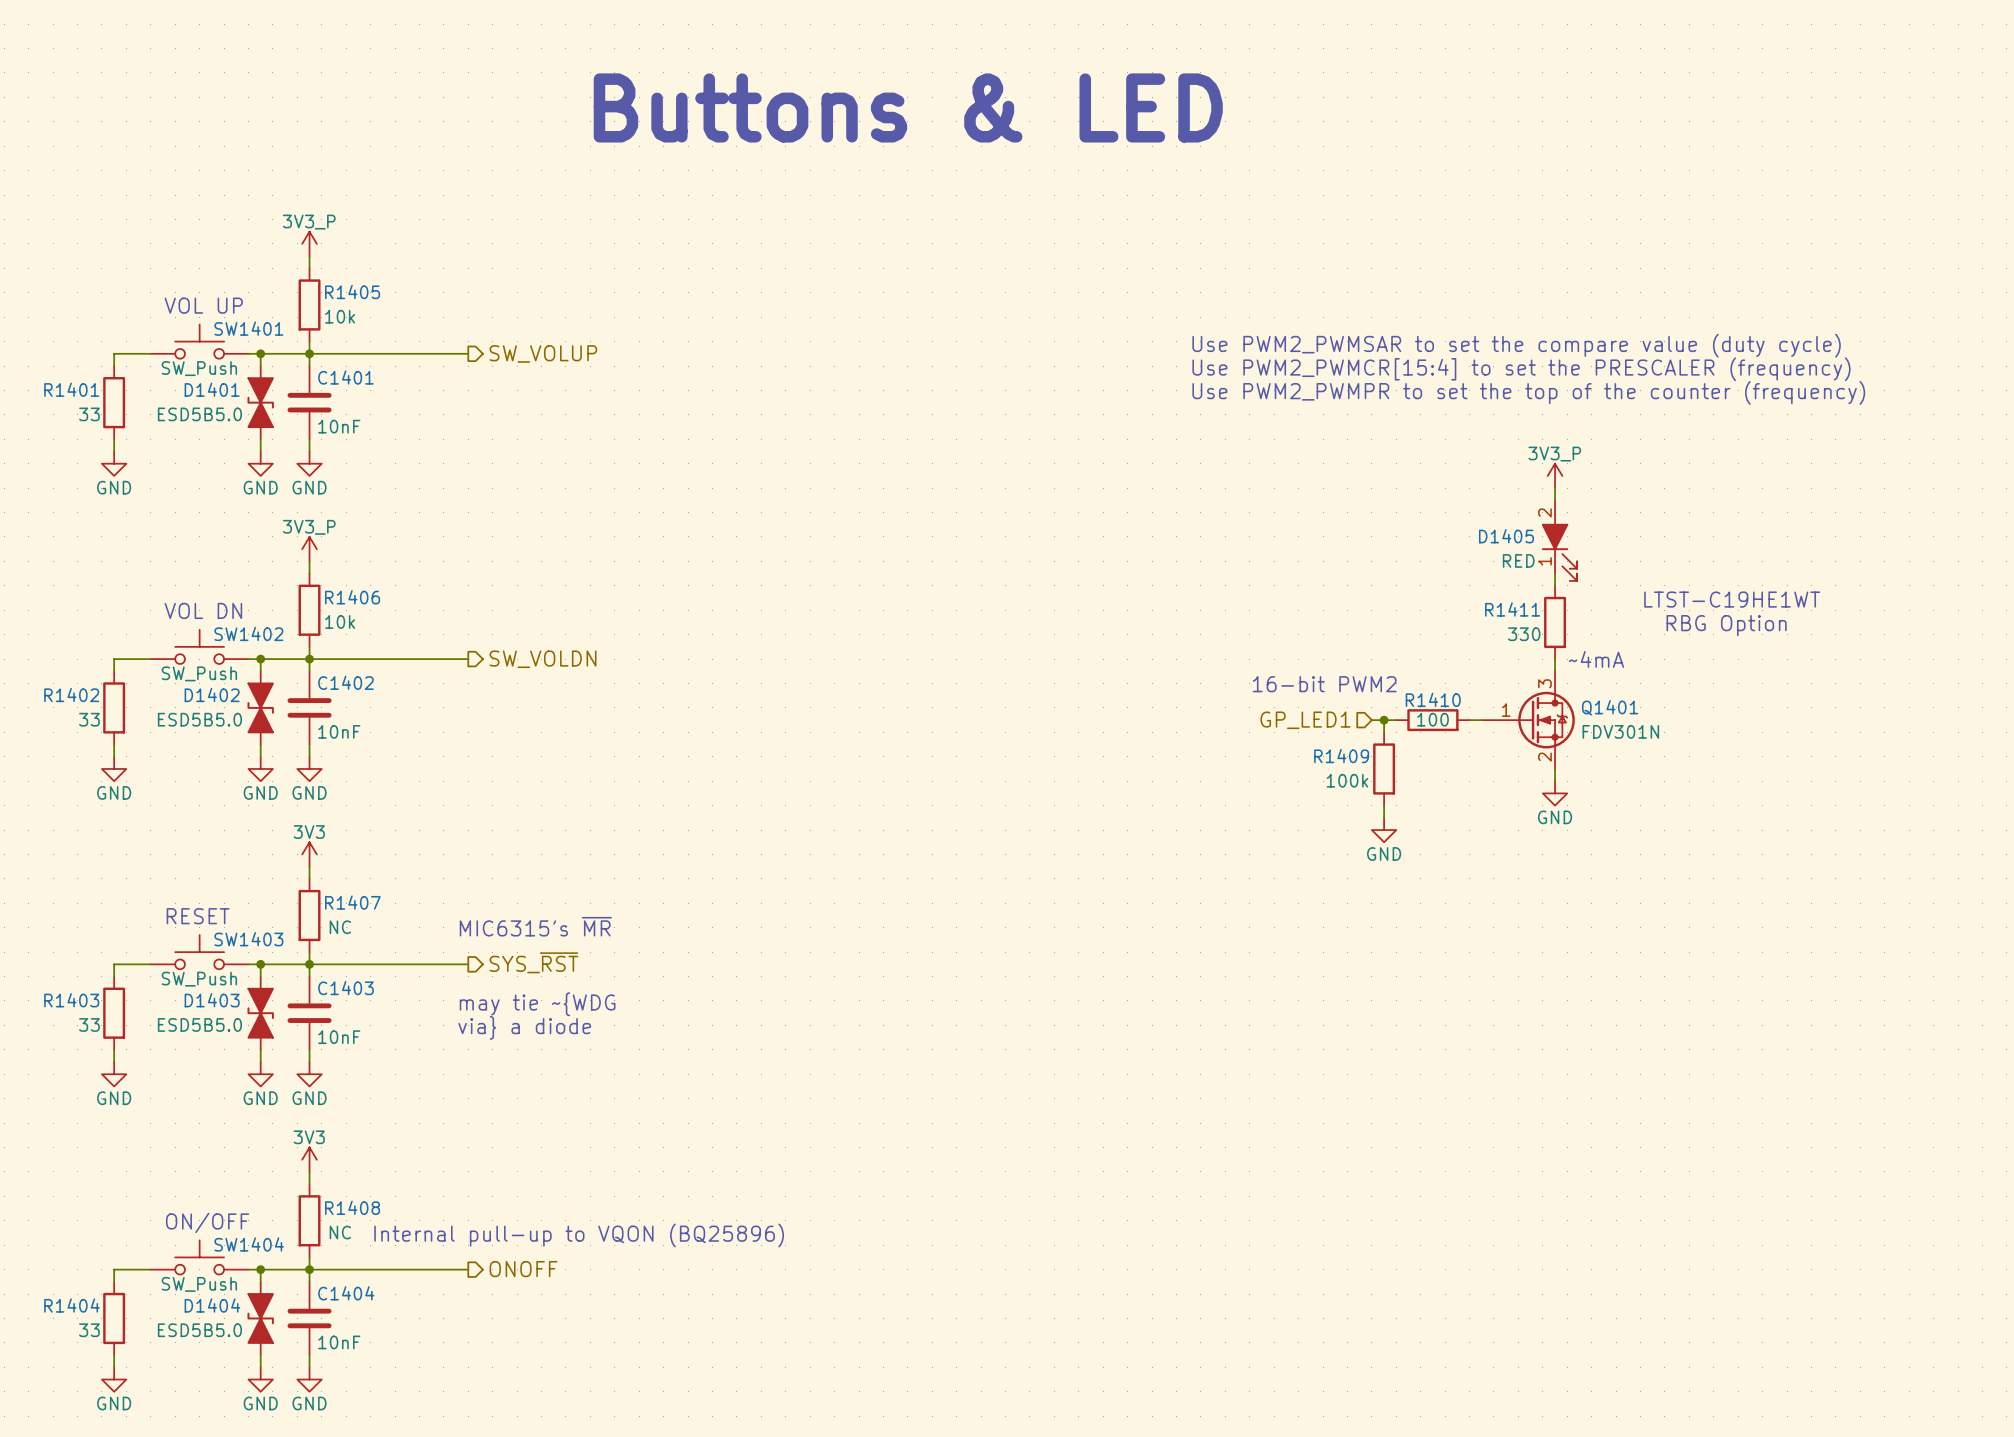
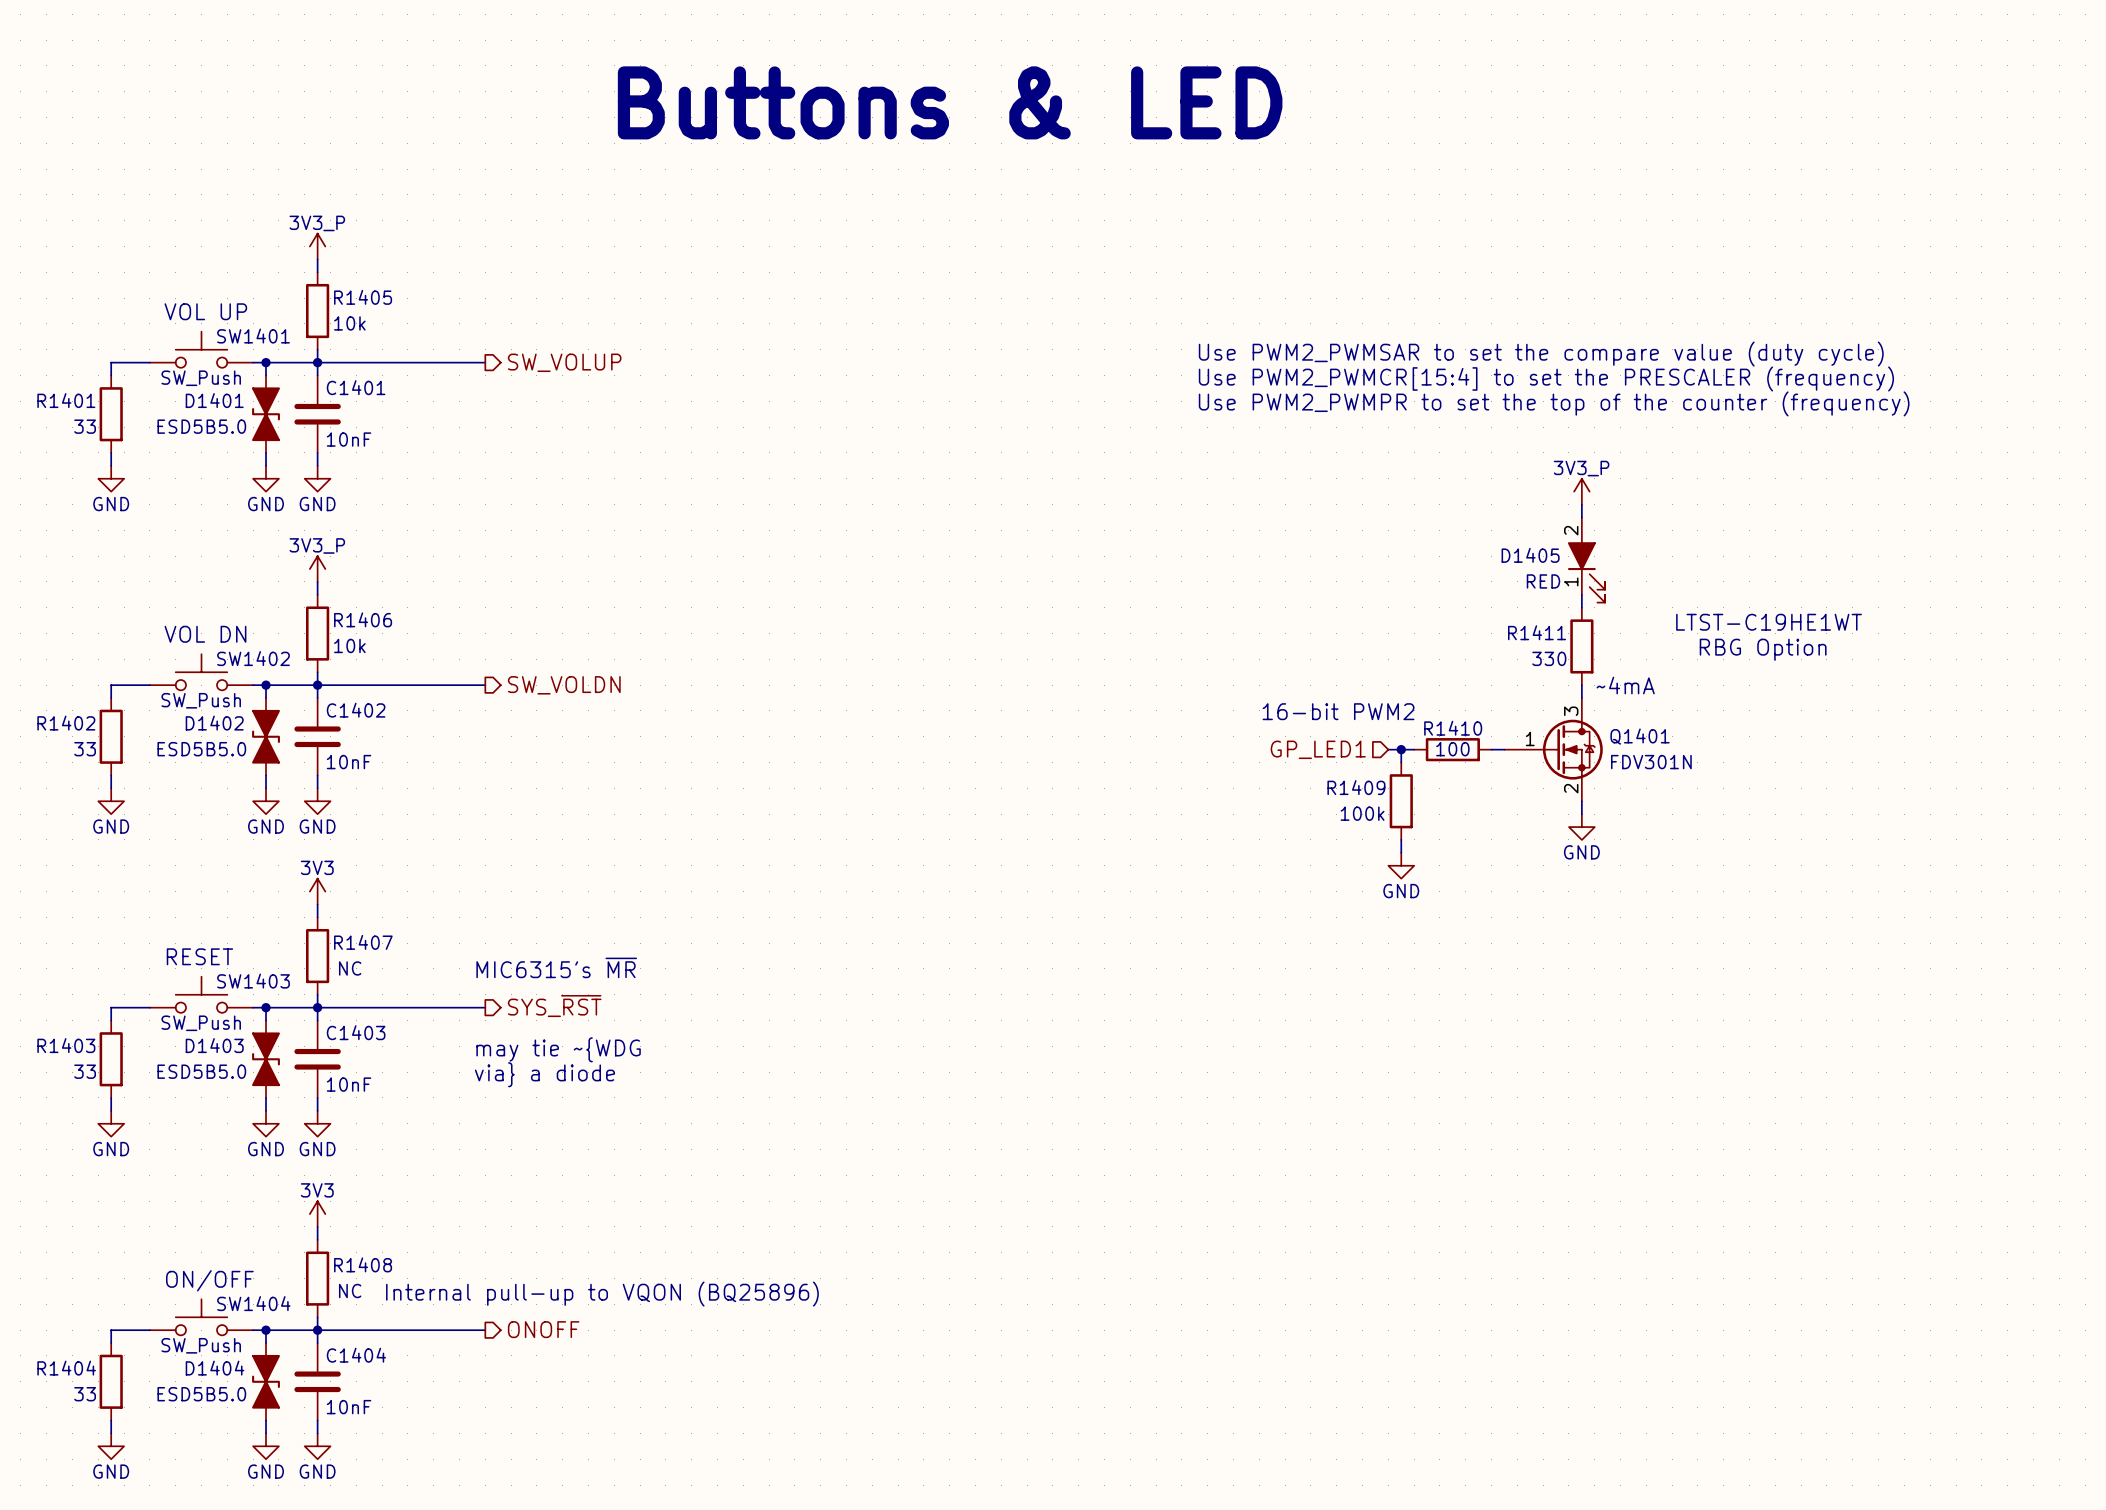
text position: Use PWM2_PWMSAR to set the compare value (duty cycle) (1516, 345) -> Use PWM2_PWMSAR to set the compare value (duty cycle) (1541, 354)
text position: Use PWM2_PWMCR[15:4] to set the PRESCALER (frequency) (1521, 369) -> Use PWM2_PWMCR[15:4] to set the PRESCALER (frequency) (1546, 378)
text position: Use PWM2_PWMPR to set the top of the counter (frequency) (1528, 392) -> Use PWM2_PWMPR to set the top of the counter (frequency) (1554, 403)
power symbol position: 3V3_P (1555, 475) -> 3V3_P (1581, 491)
wire: (1555, 488) (1555, 500) -> (1581, 504) (1581, 517)
D1405 position: (1559, 540) -> (1586, 560)
wire: (1555, 573) (1555, 585) -> (1581, 594) (1581, 607)
text position: LTST-C19HE1WT (1732, 599) -> LTST-C19HE1WT (1769, 622)
R1411 position: (1555, 622) -> (1581, 646)
text position: RBG Option (1726, 625) -> RBG Option (1763, 649)
wire: (1555, 659) (1555, 671) -> (1581, 685) (1581, 698)
text position: ~4mA (1596, 659) -> ~4mA (1625, 685)
text position: 16-bit PWM2 (1324, 684) -> 16-bit PWM2 (1338, 711)
hierarchical label position: GP_LED1 (1305, 720) -> GP_LED1 (1318, 749)
wire: (1371, 720) (1396, 720) -> (1388, 749) (1414, 749)
wire: (1384, 720) (1384, 732) -> (1401, 749) (1401, 762)
junction position: (1384, 720) -> (1401, 749)
R1410 position: (1432, 720) -> (1452, 749)
Q1401 position: (1528, 720) -> (1553, 749)
R1409 position: (1384, 768) -> (1401, 801)
wire: (1555, 768) (1555, 781) -> (1581, 801) (1581, 814)
power symbol position: GND (1555, 793) -> GND (1581, 827)
wire: (1384, 805) (1384, 817) -> (1401, 839) (1401, 852)
power symbol position: GND (1384, 830) -> GND (1401, 865)

